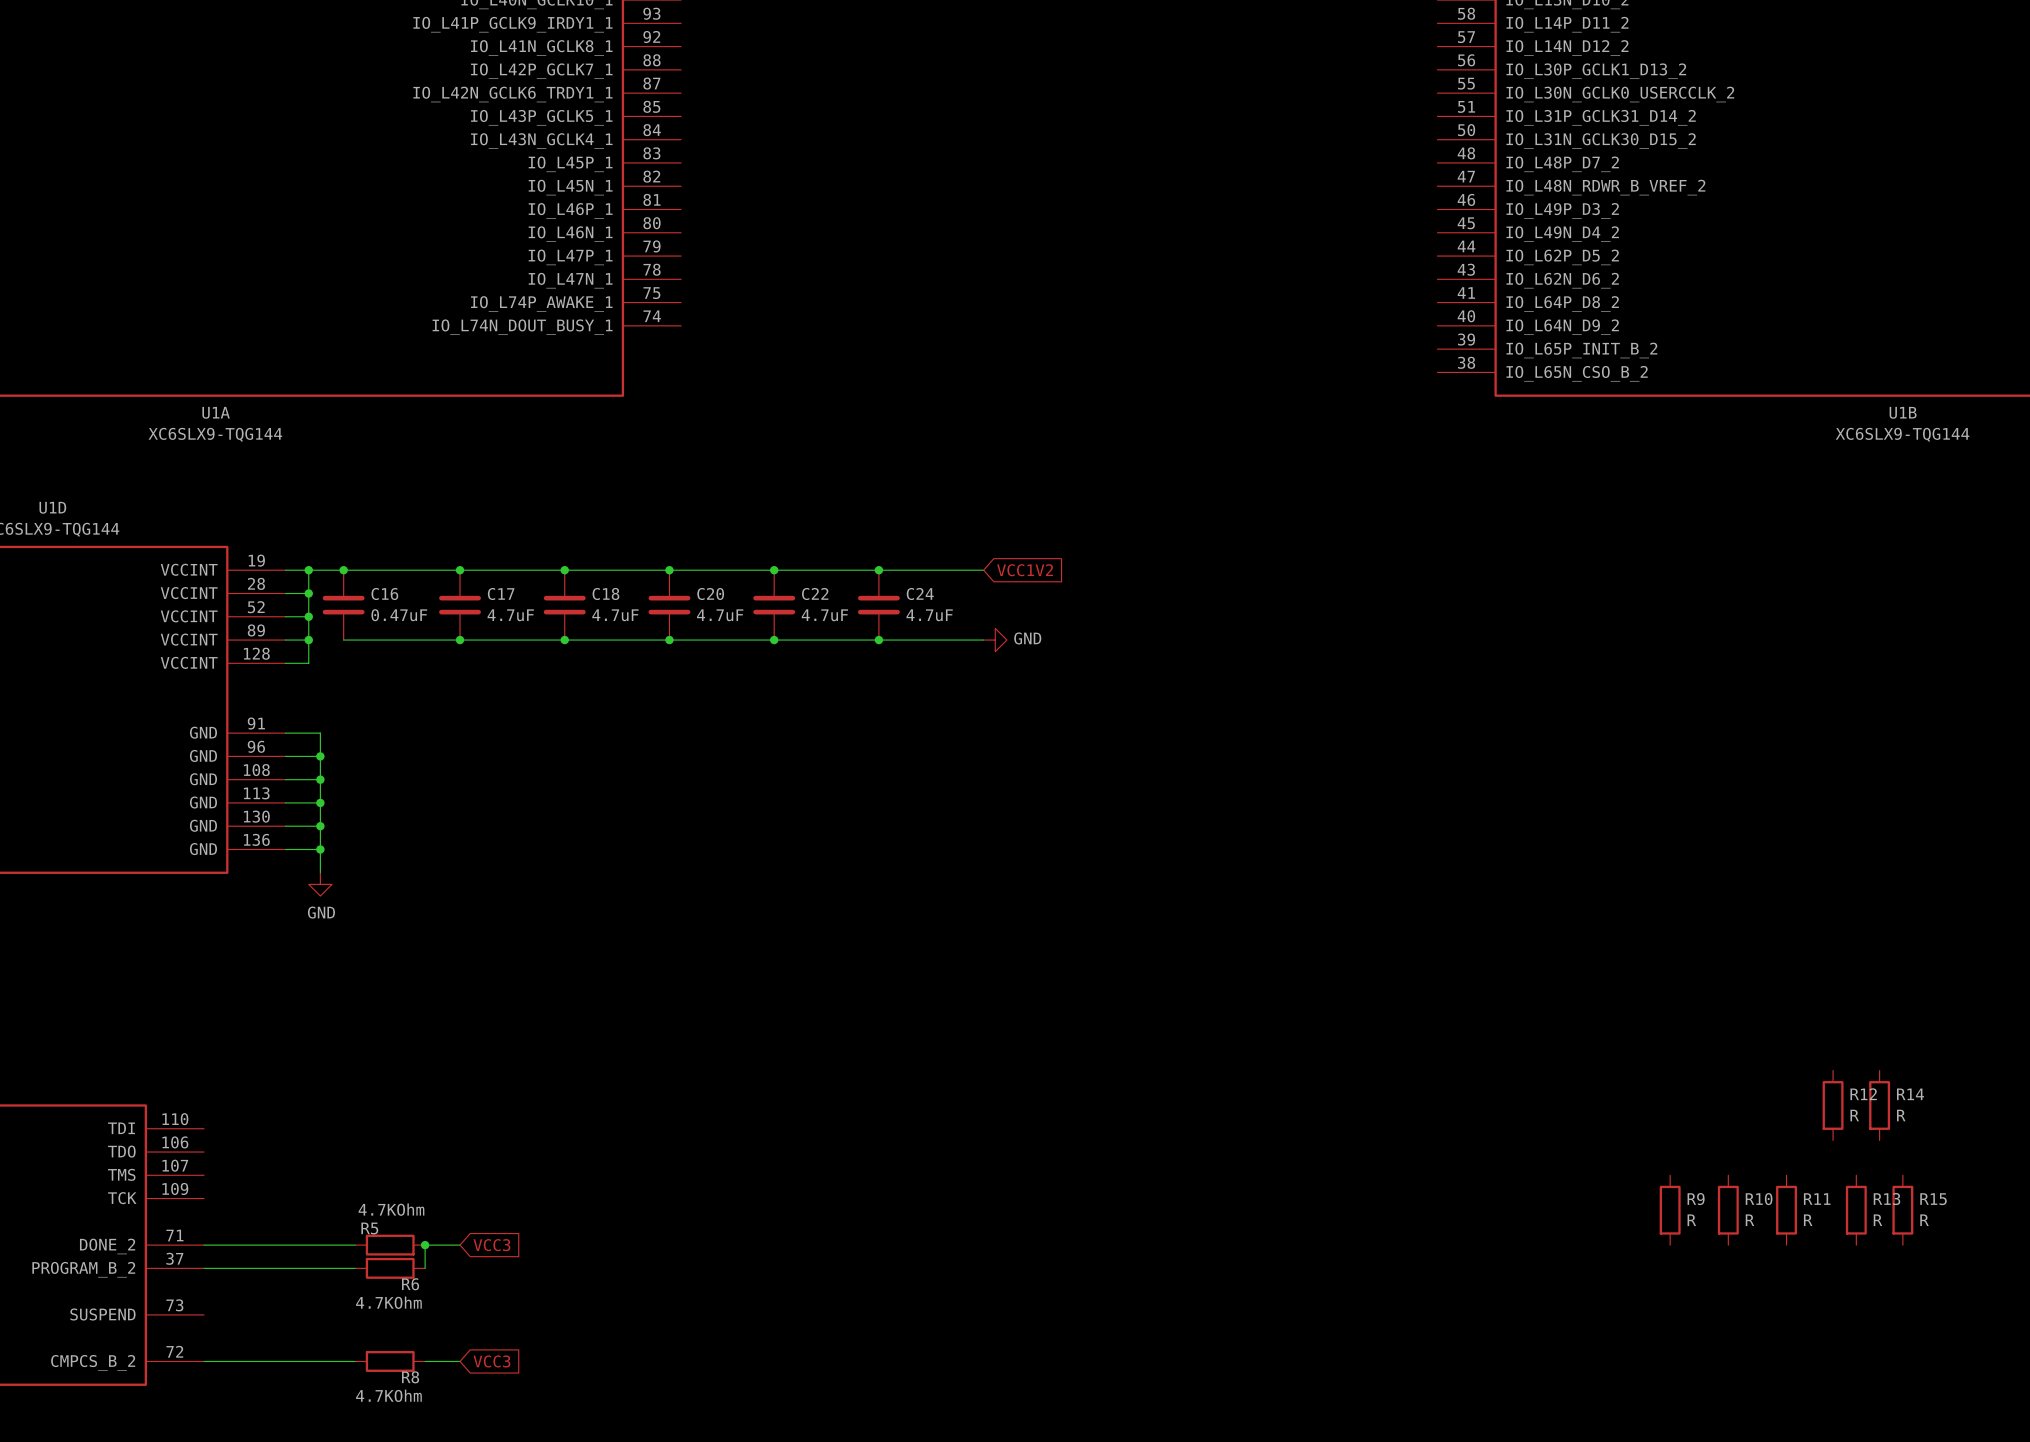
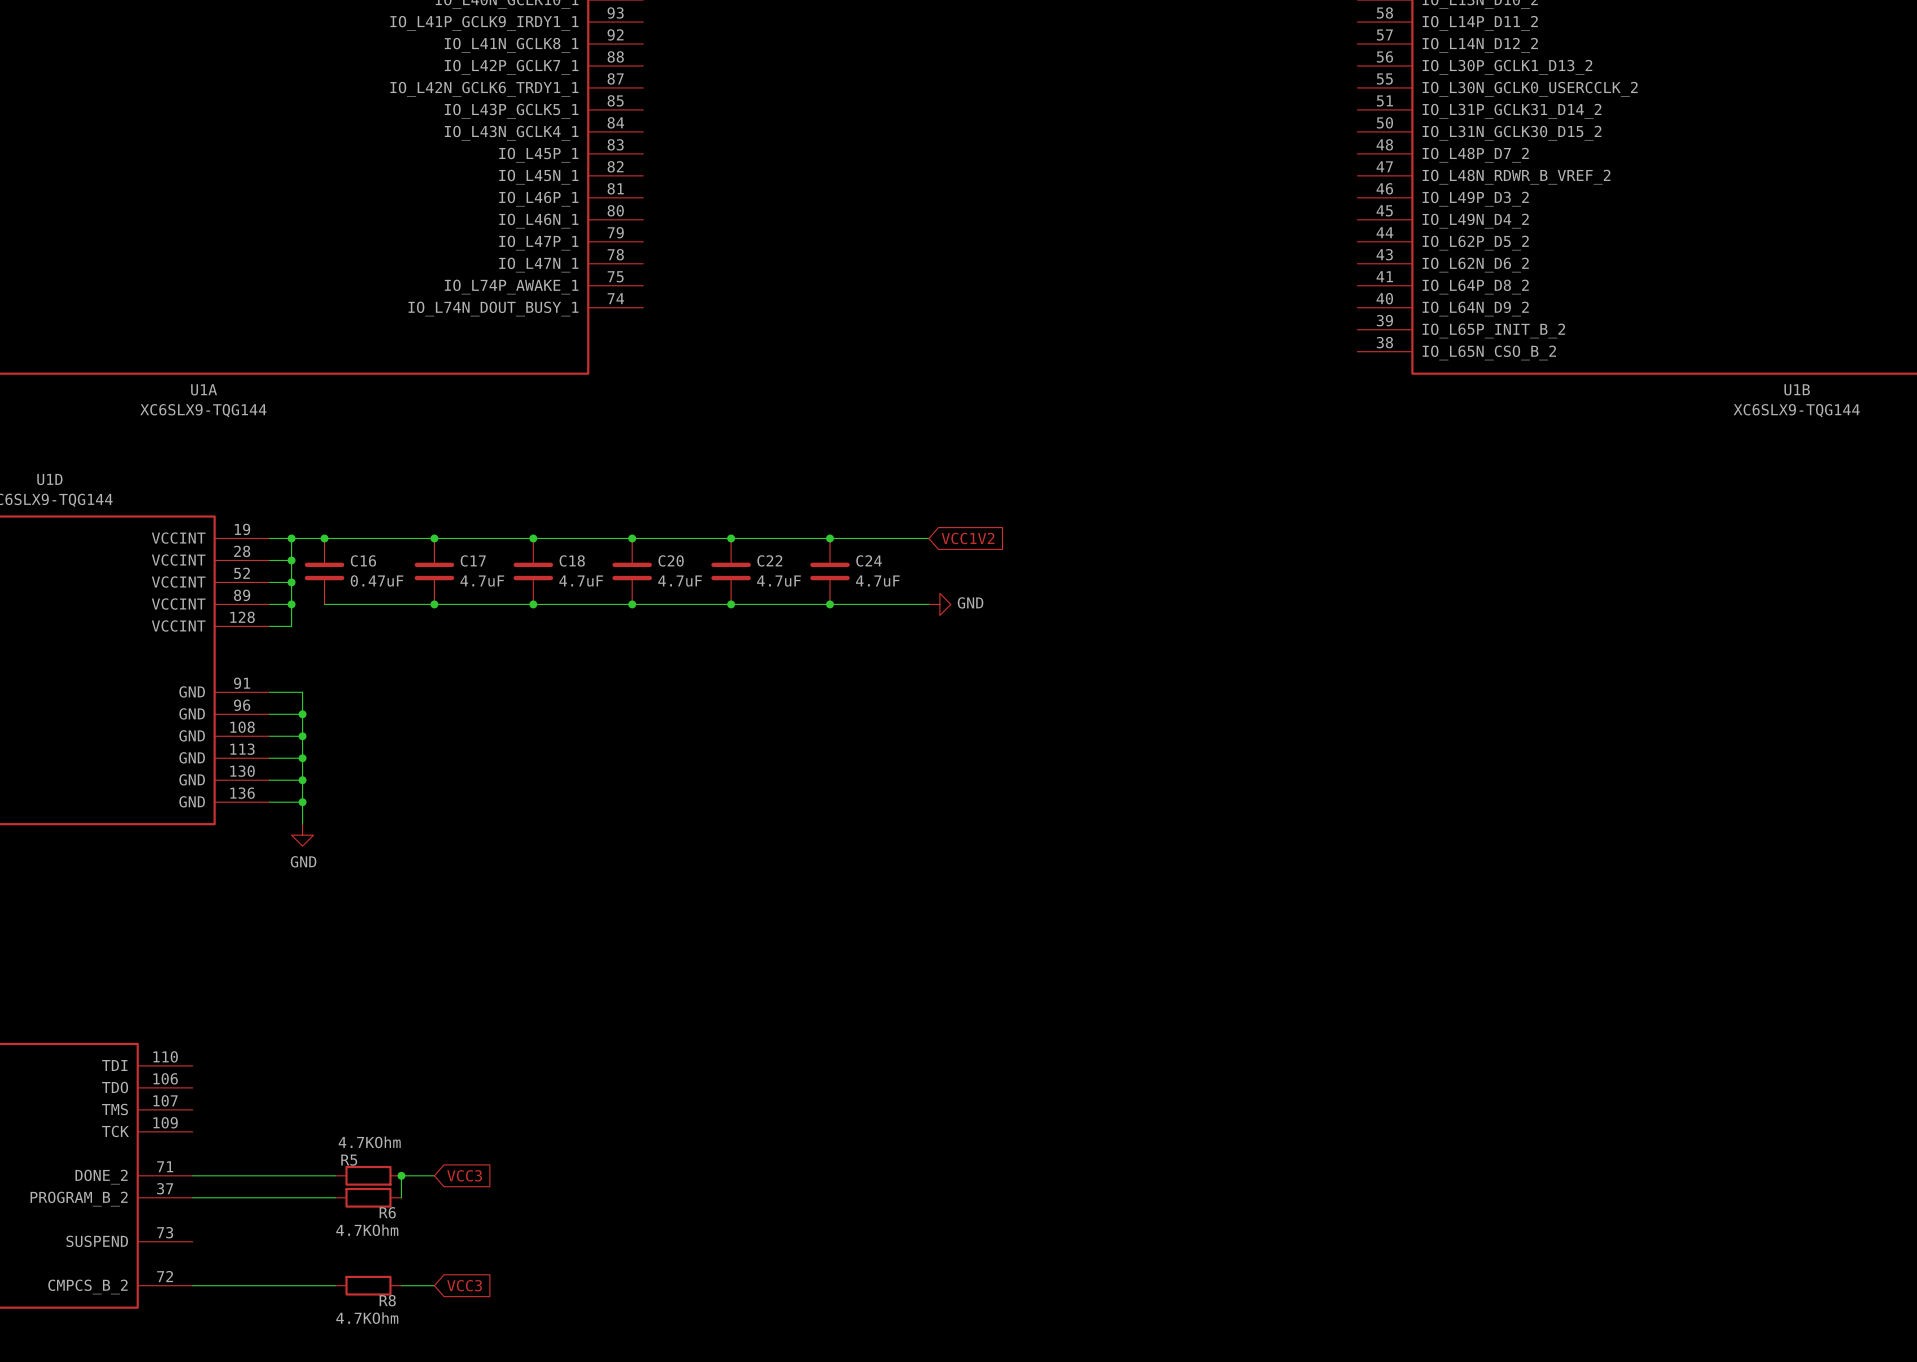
R12: R (1833, 1105) -> none
R14: R (1879, 1105) -> none
R9: R (1670, 1210) -> none
R10: R (1728, 1210) -> none
R11: R (1786, 1210) -> none
R13: R (1856, 1210) -> none
R15: R (1902, 1210) -> none

